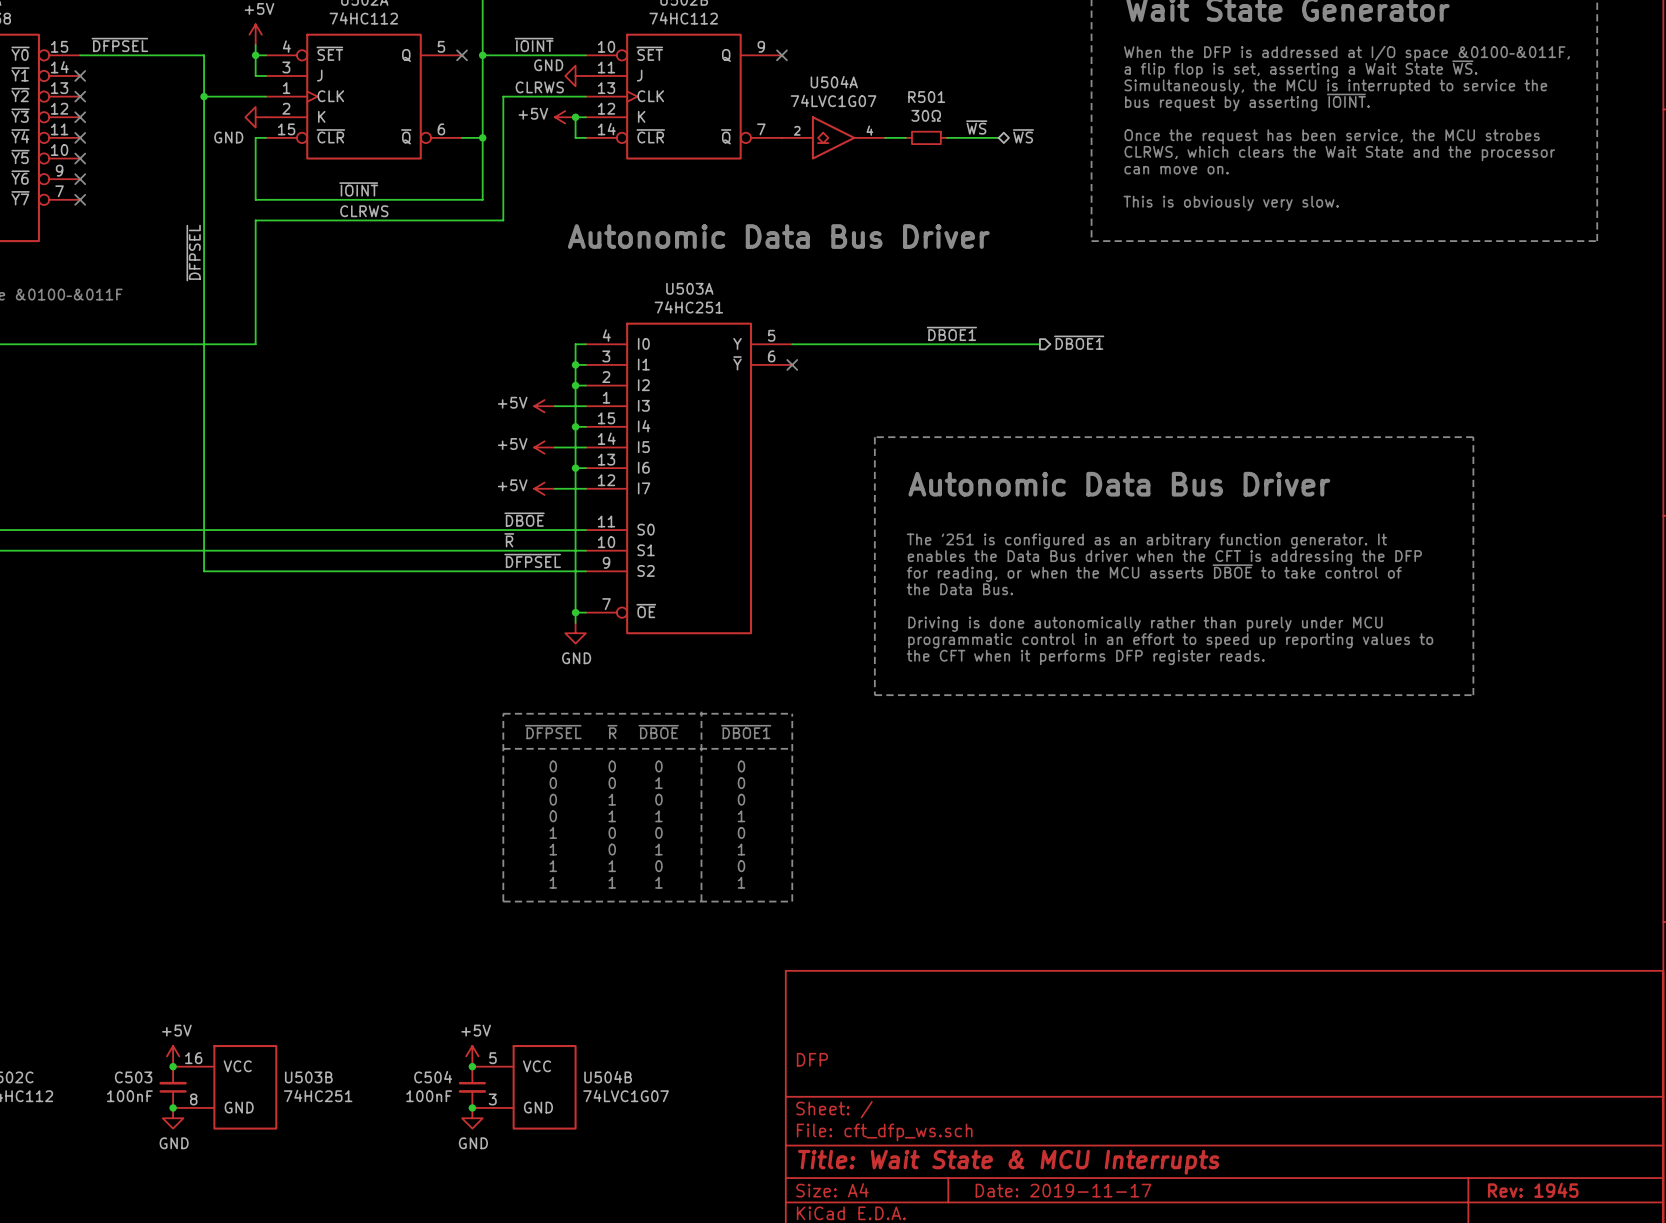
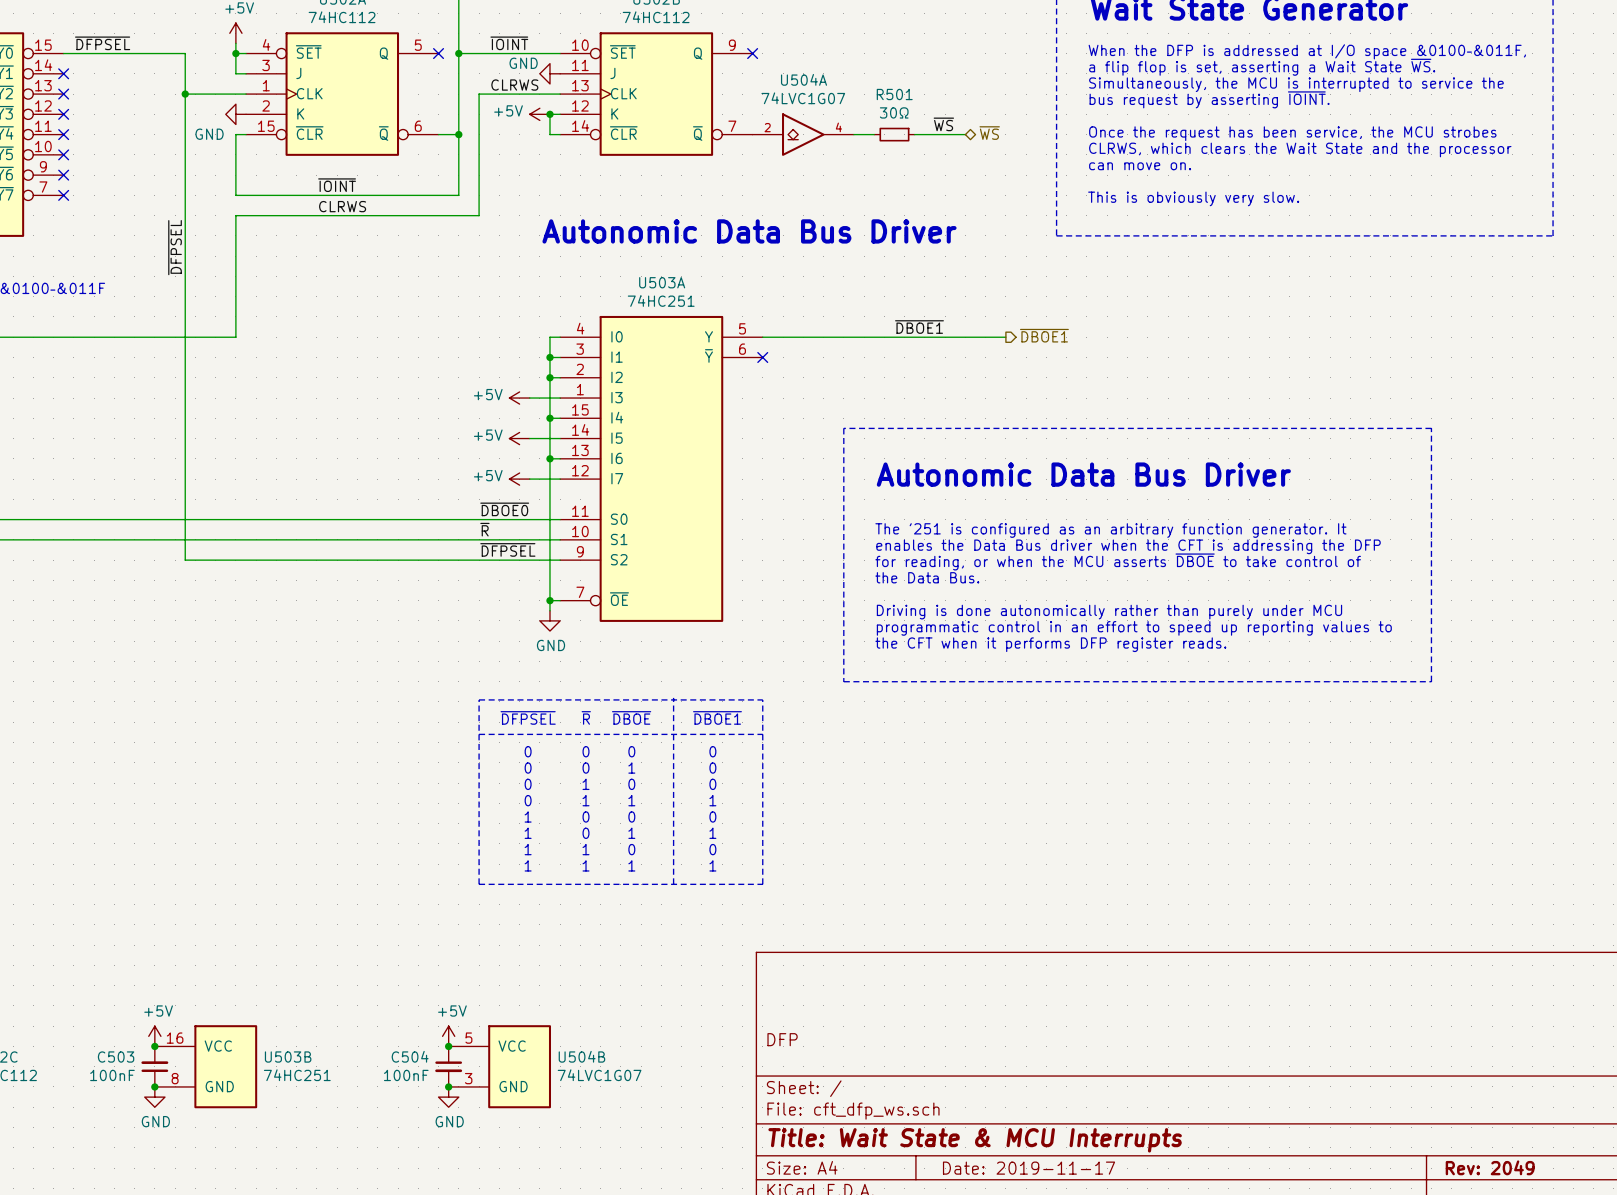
label: ~{DBOE} (524, 519) -> ~{DBOE0} (504, 509)
title block: Rev: 1945 (1533, 1190) -> Rev: 2049 (1490, 1167)

